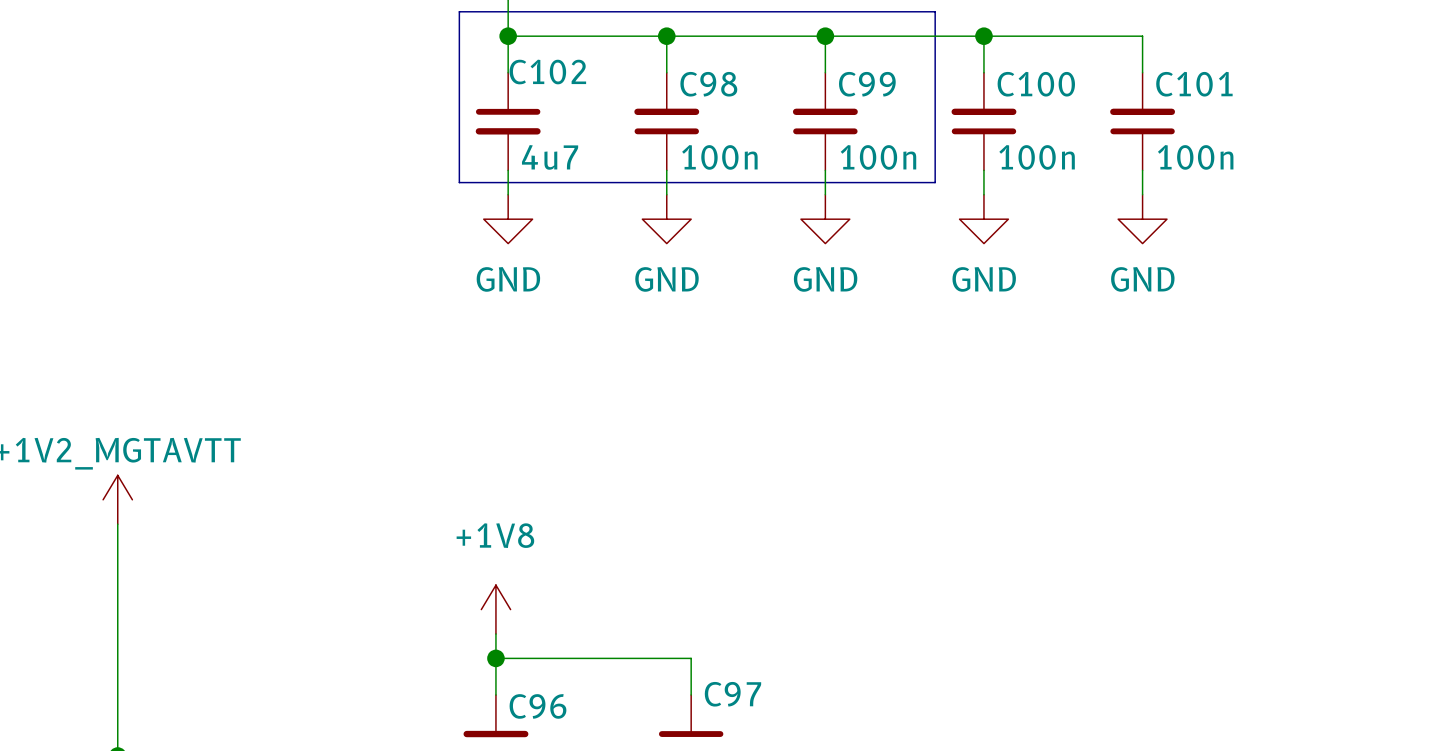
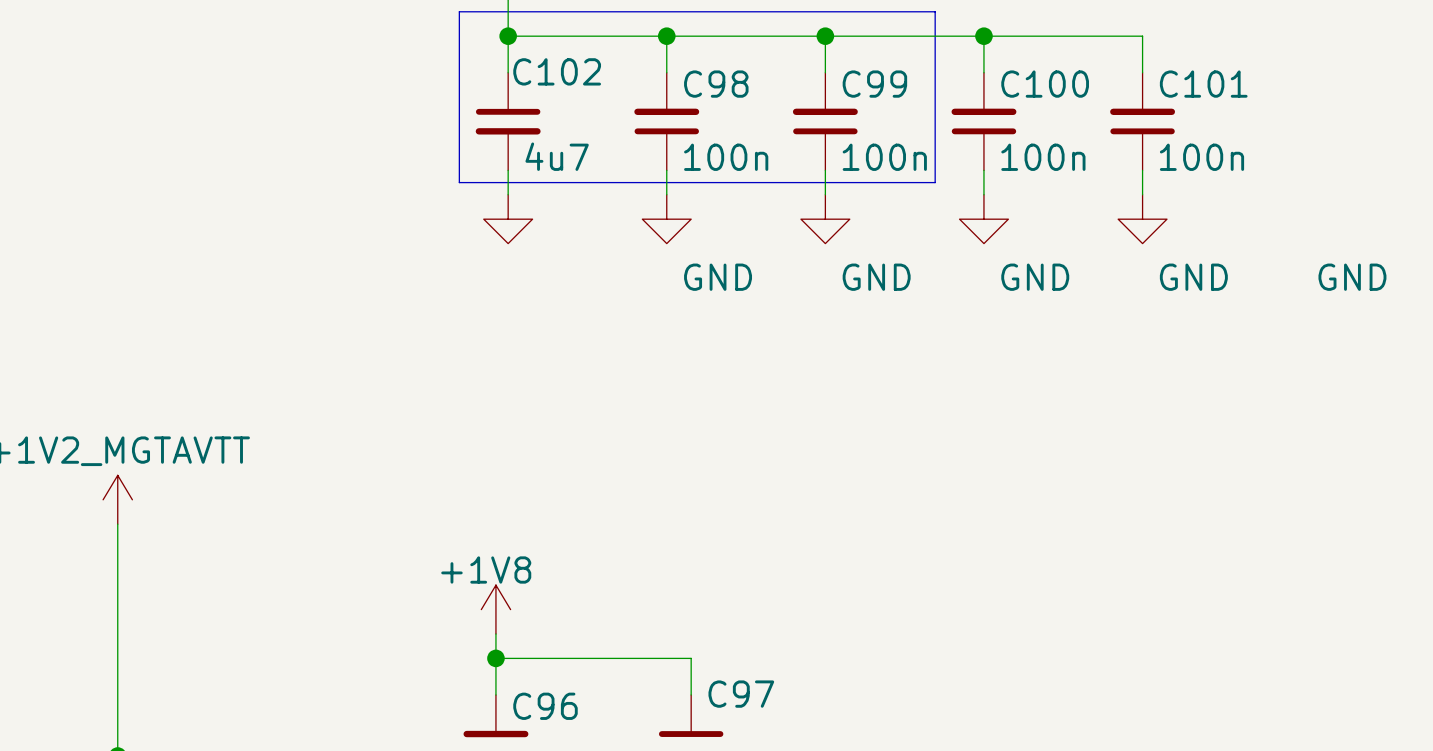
power symbol text position: GND (508, 279) -> GND (718, 277)
power symbol text position: GND (666, 279) -> GND (876, 277)
power symbol text position: GND (825, 279) -> GND (1035, 277)
power symbol text position: GND (984, 279) -> GND (1193, 277)
power symbol text position: GND (1142, 279) -> GND (1352, 277)
power symbol text position: +1V8 (495, 535) -> +1V8 (486, 570)

